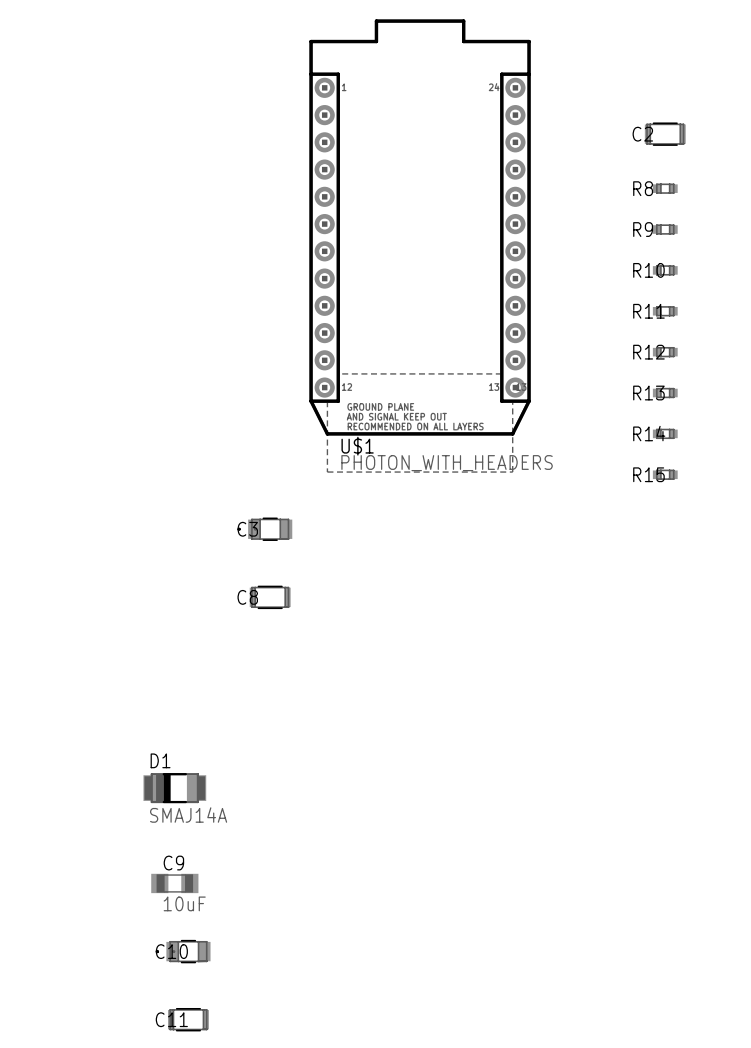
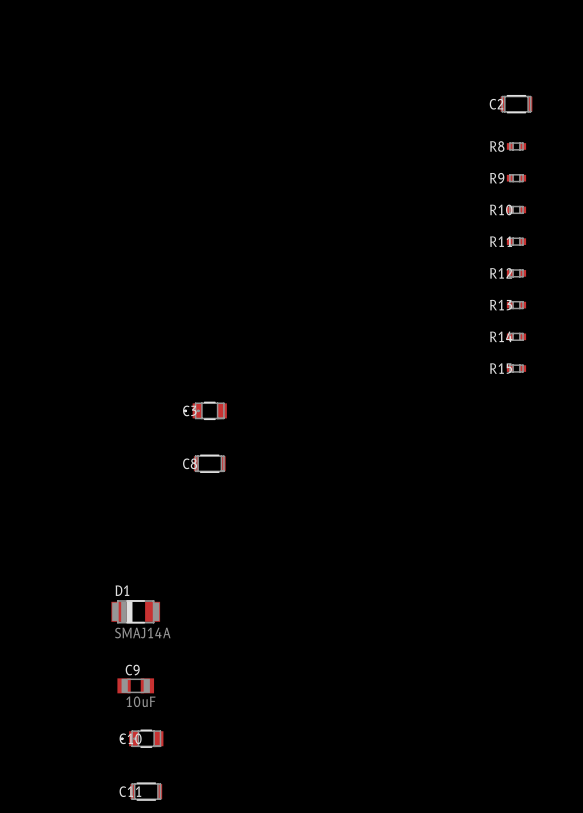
U$1: PHOTON_WITH_HEADERS (420, 246) -> none

